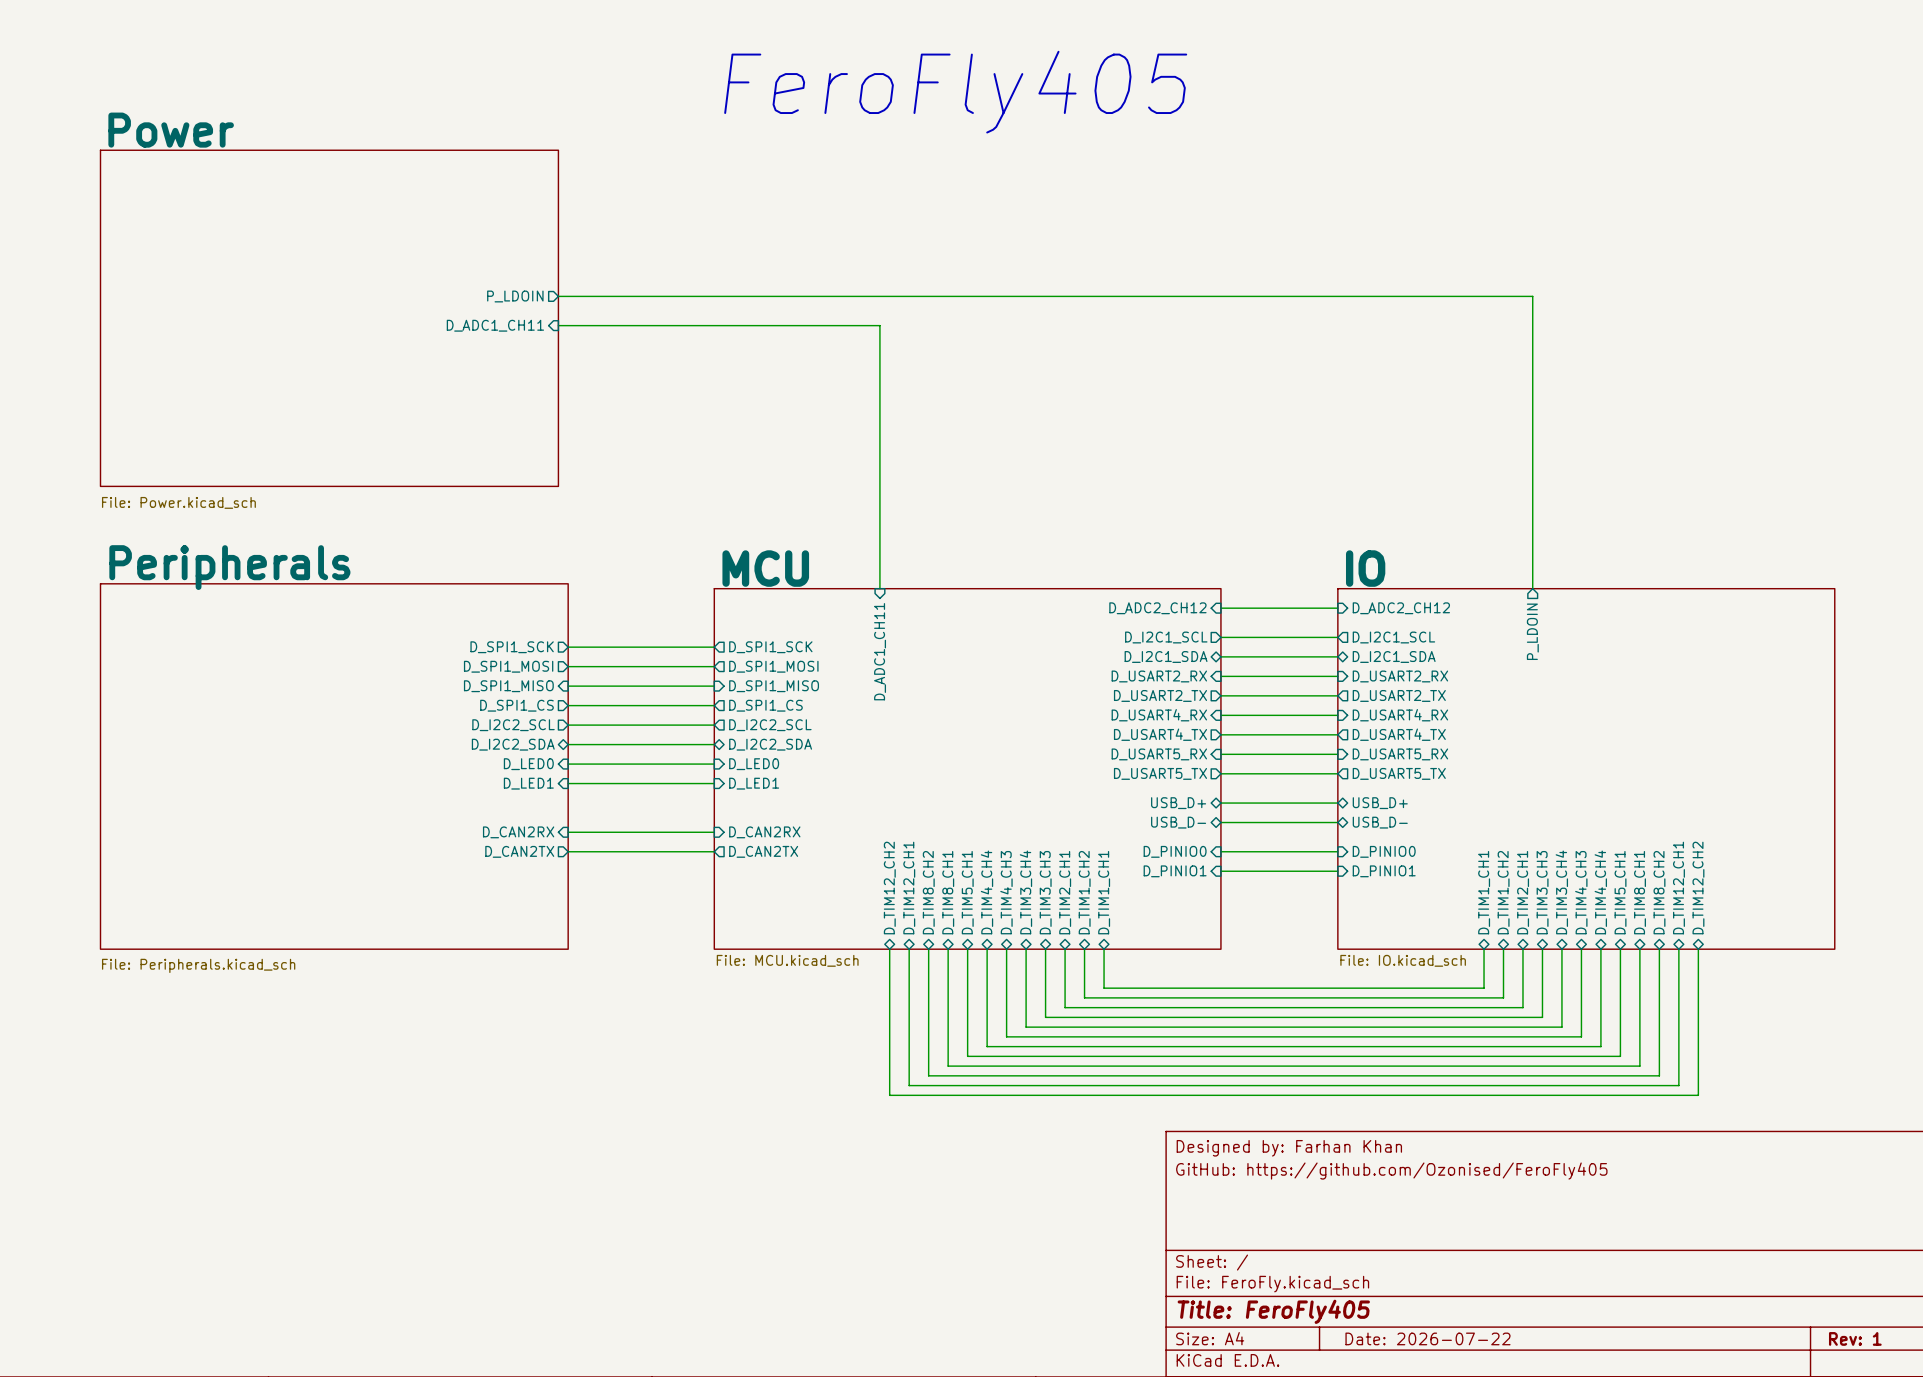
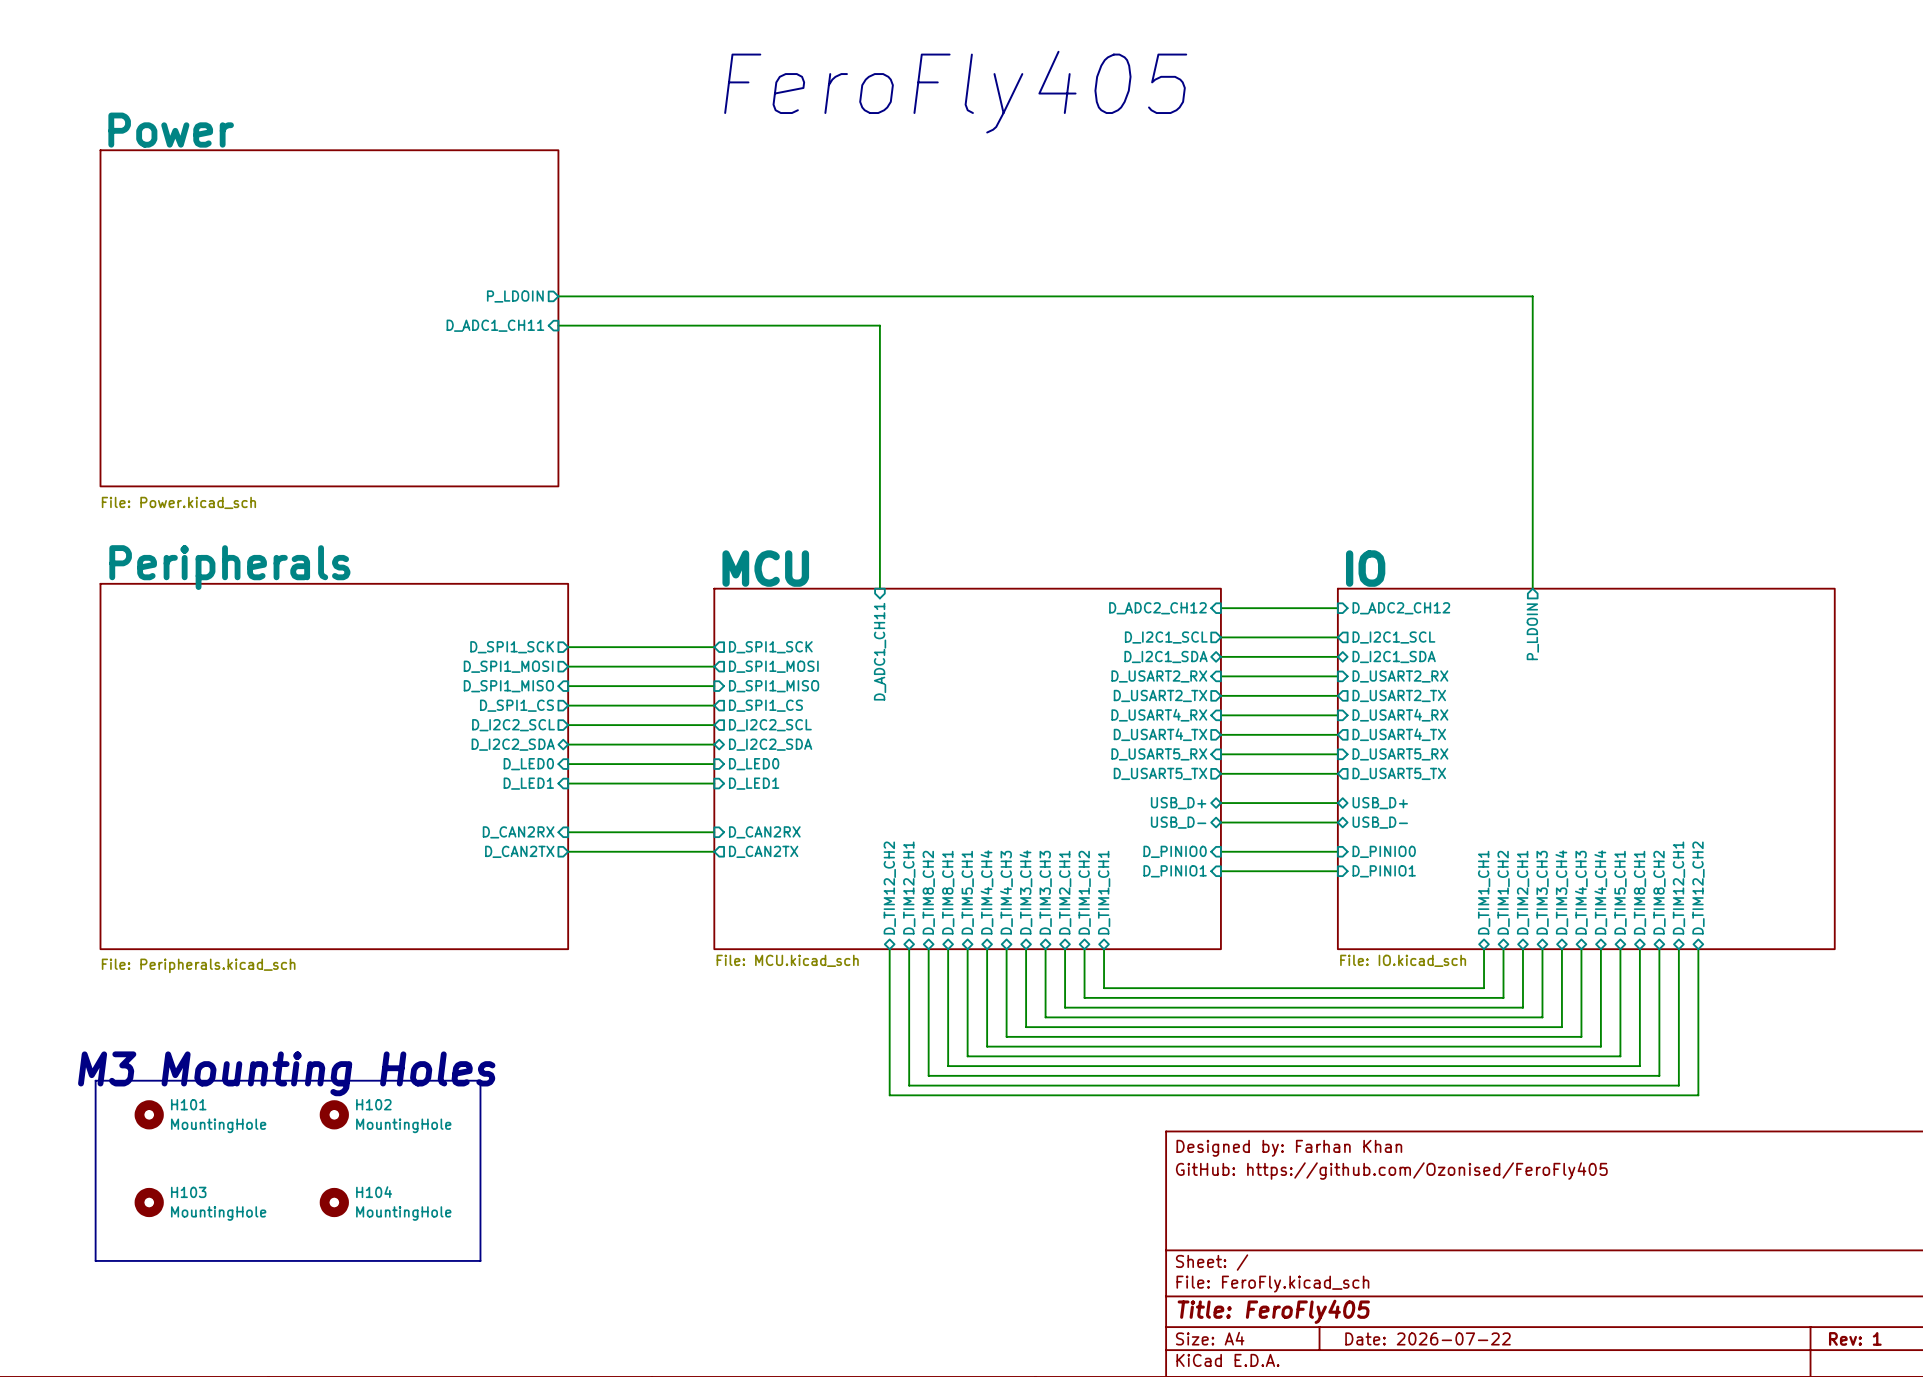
text: none -> M3 Mounting Holes (286, 1073)
line: none -> (95, 1080) (480, 1080) (480, 1260) (95, 1260) (95, 1080)
H101: none -> MountingHole (149, 1114)
H102: none -> MountingHole (334, 1114)
H103: none -> MountingHole (149, 1202)
H104: none -> MountingHole (334, 1202)

